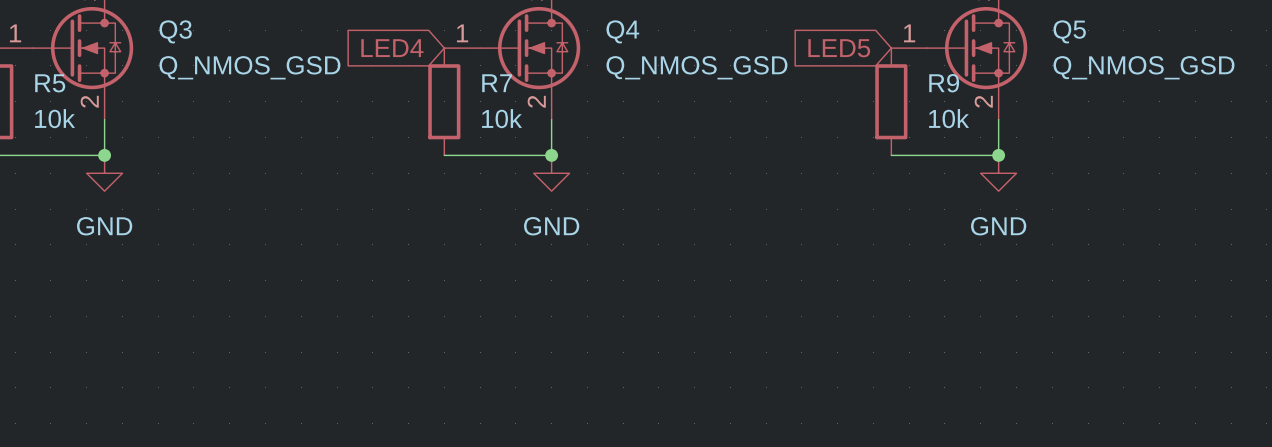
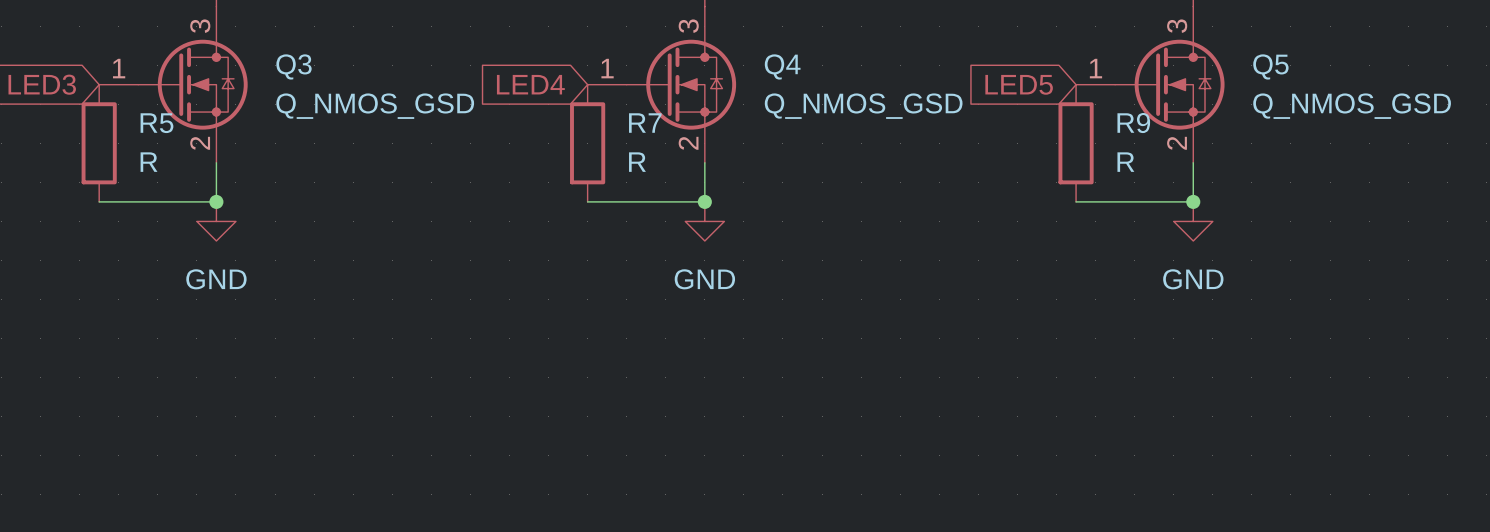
R5 value: 10k (55, 118) -> R (149, 162)
R7 value: 10k (502, 118) -> R (637, 162)
R9 value: 10k (949, 118) -> R (1125, 162)

